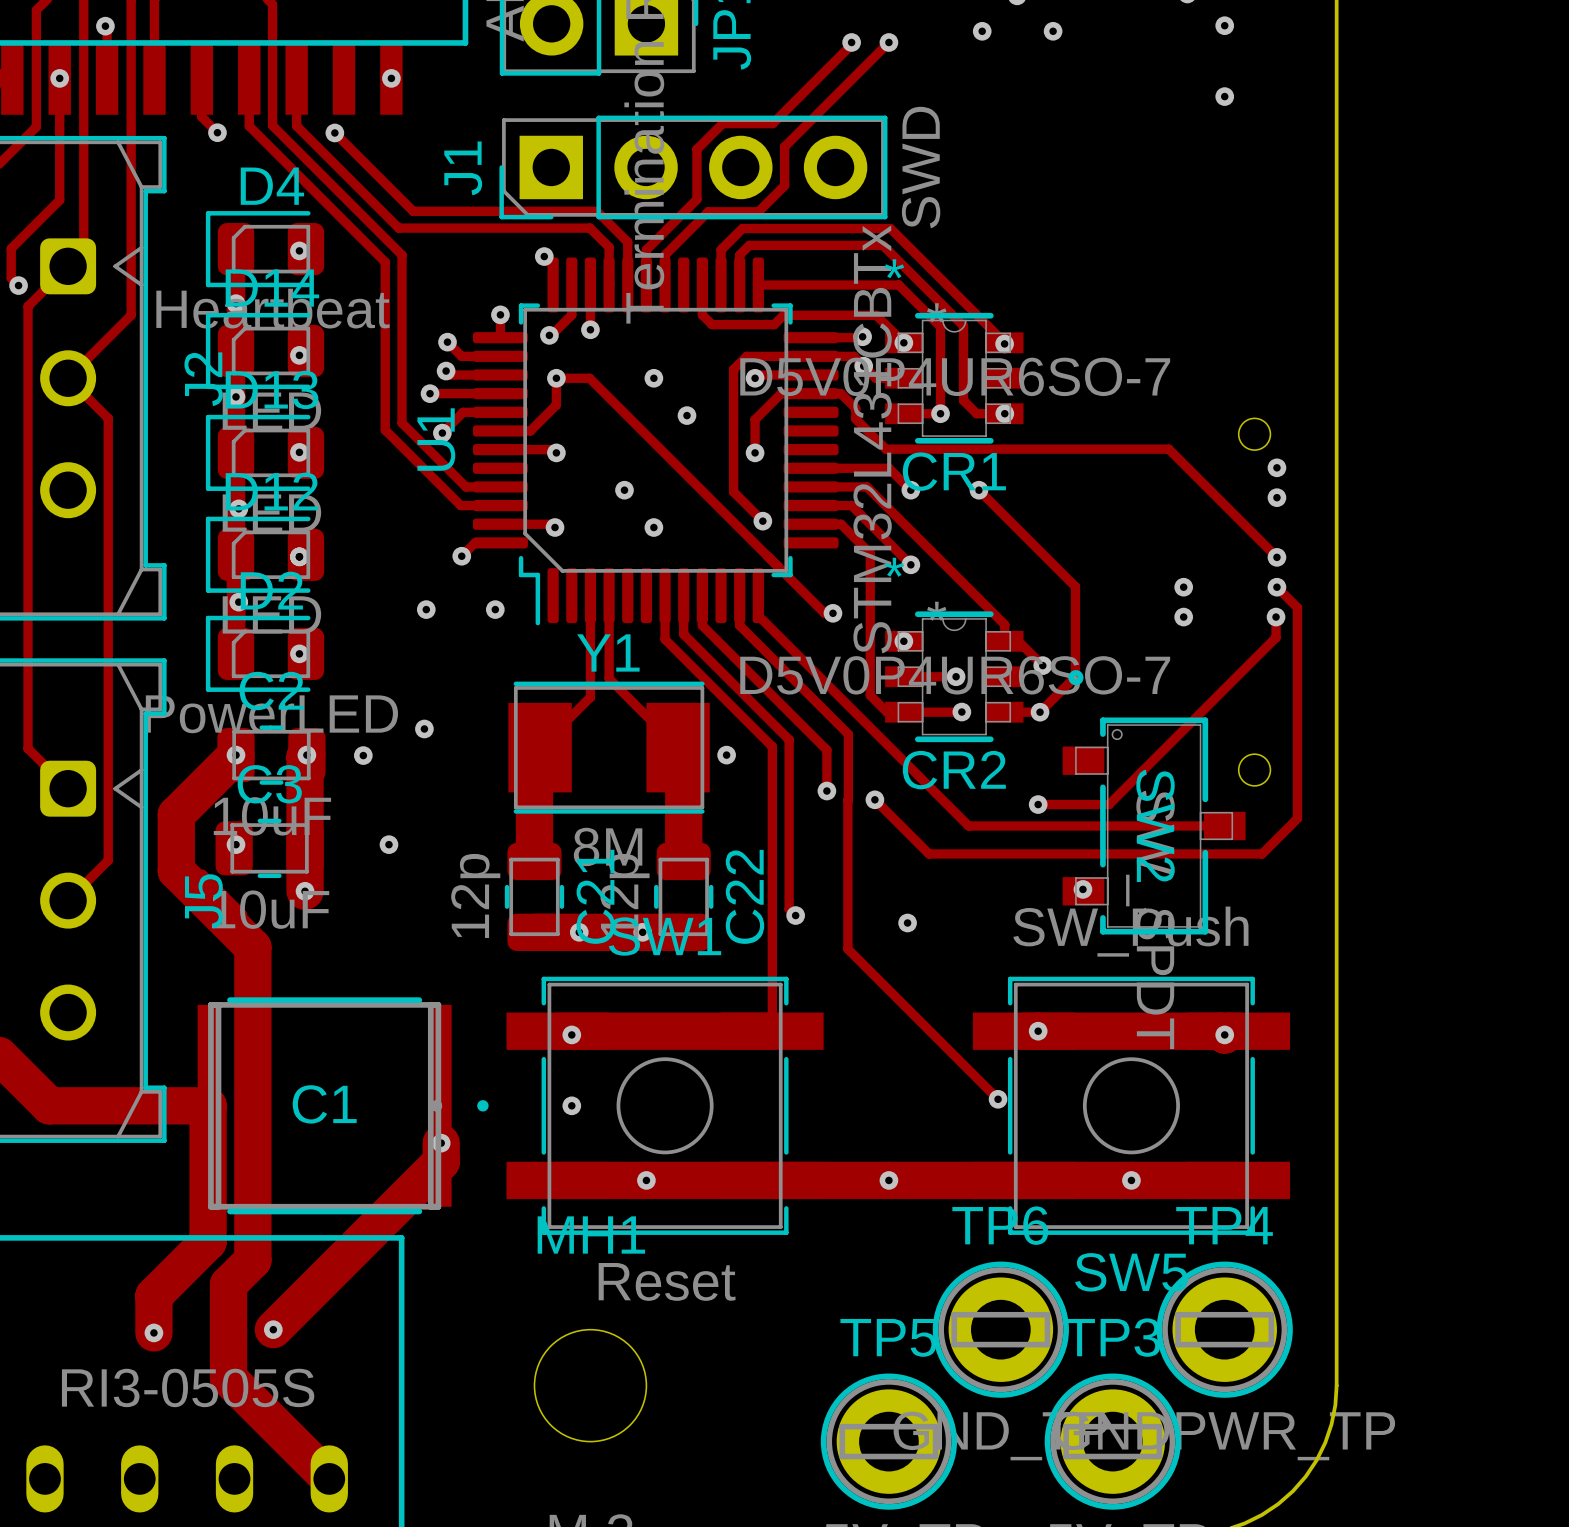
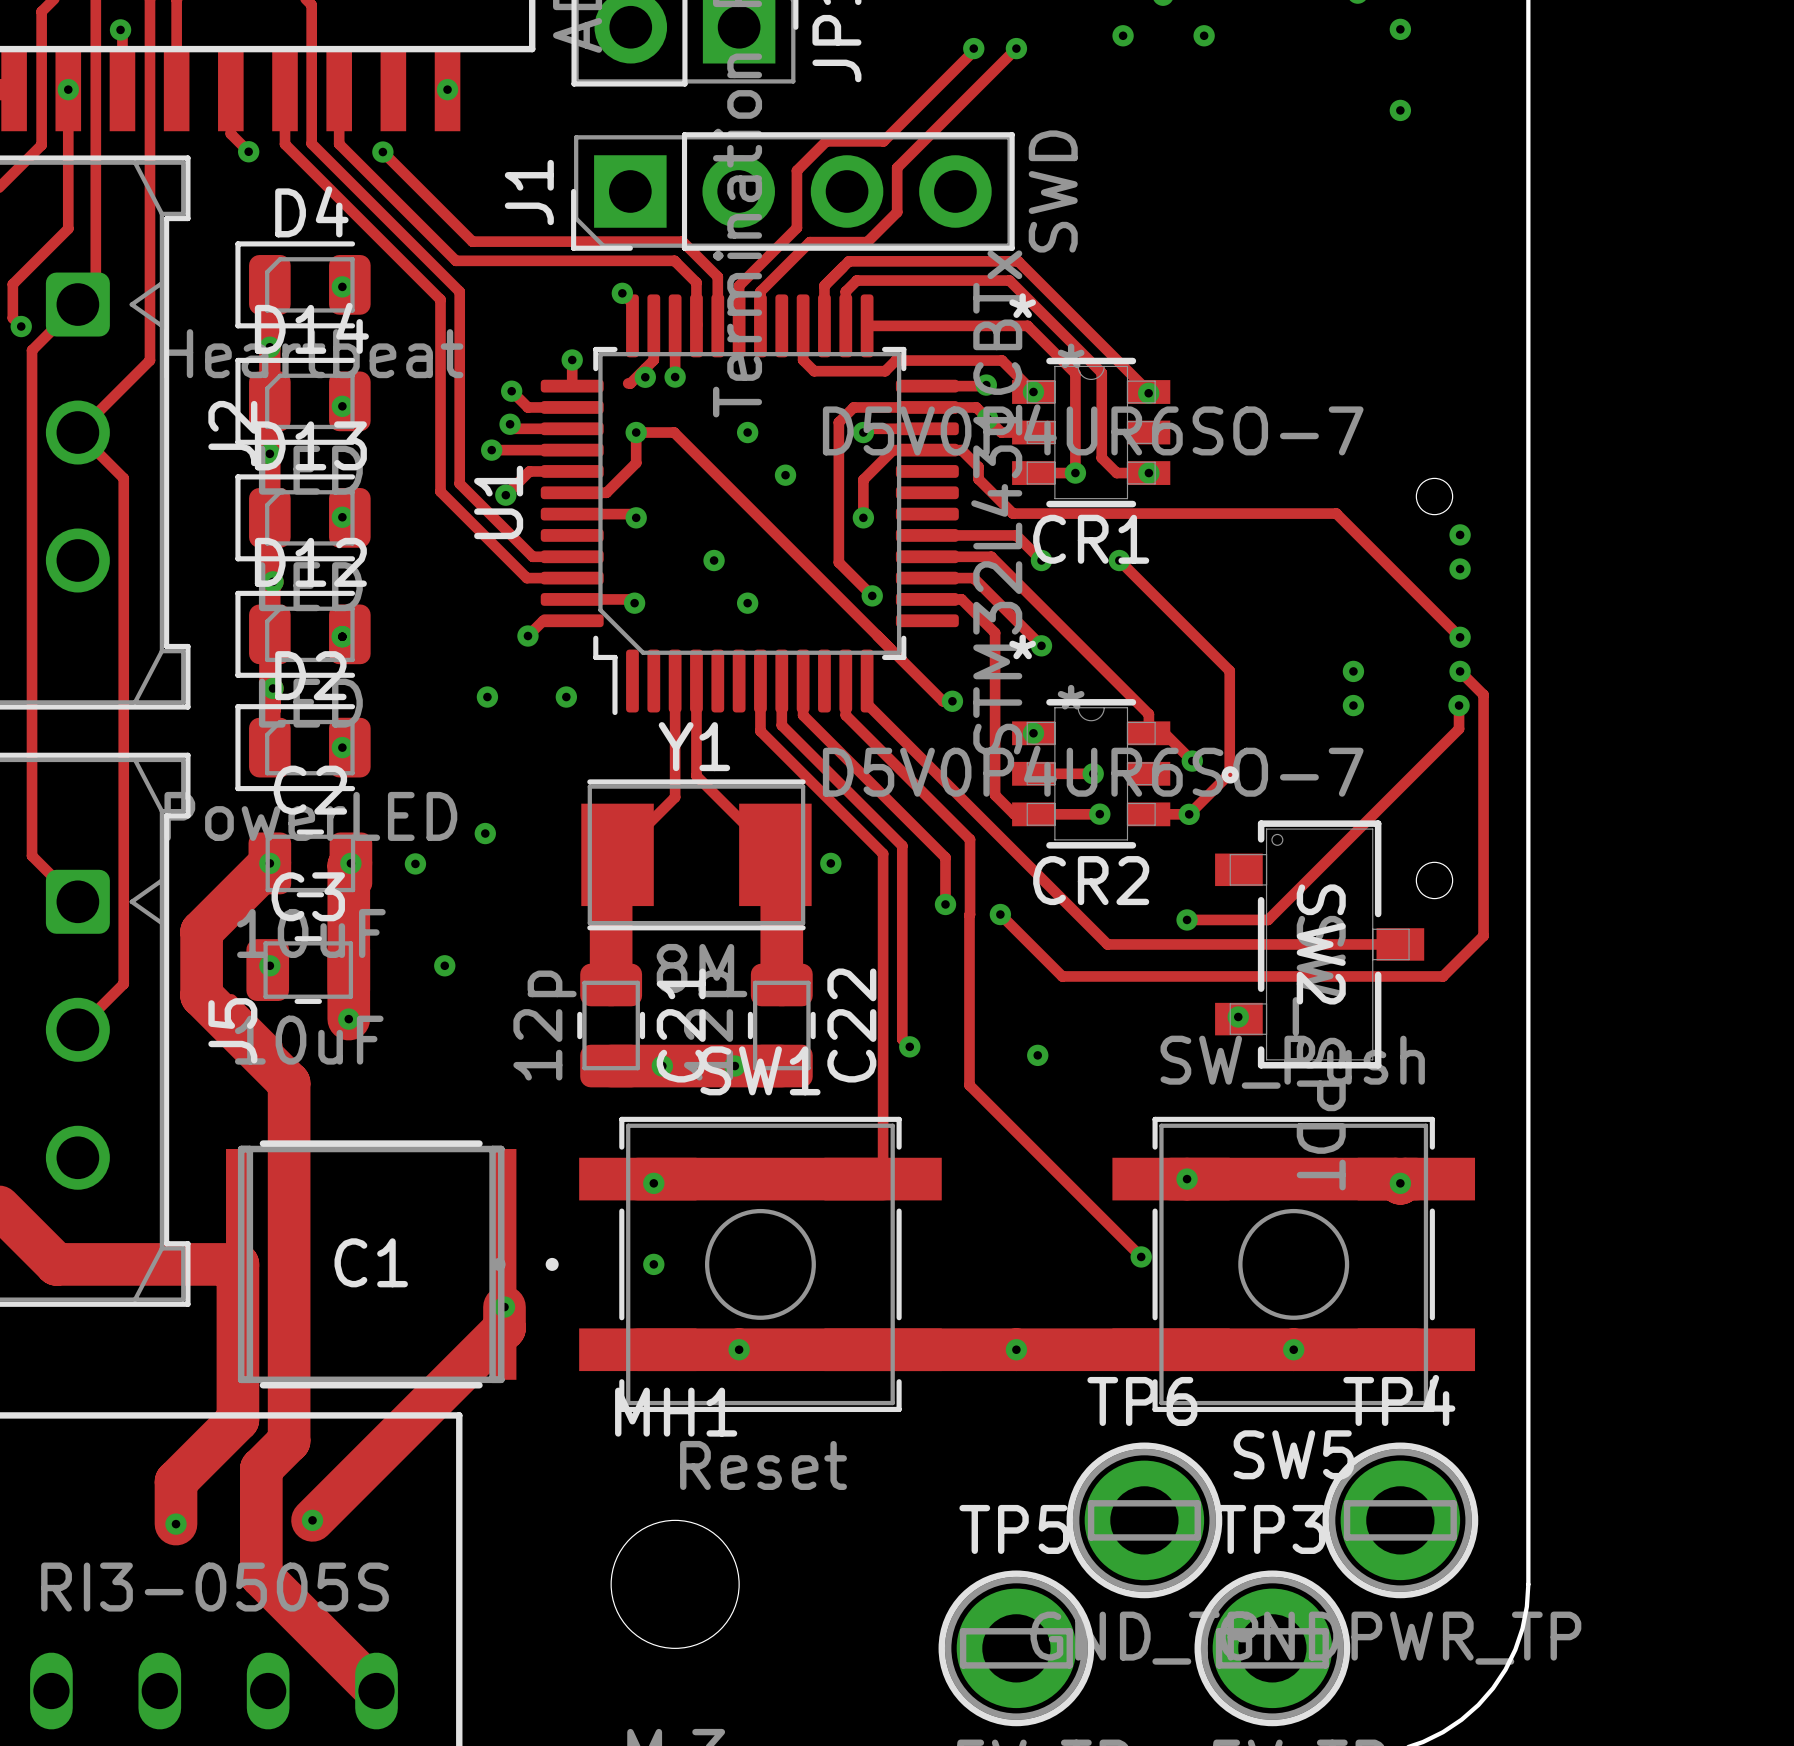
via position: (549, 335) -> (645, 377)

